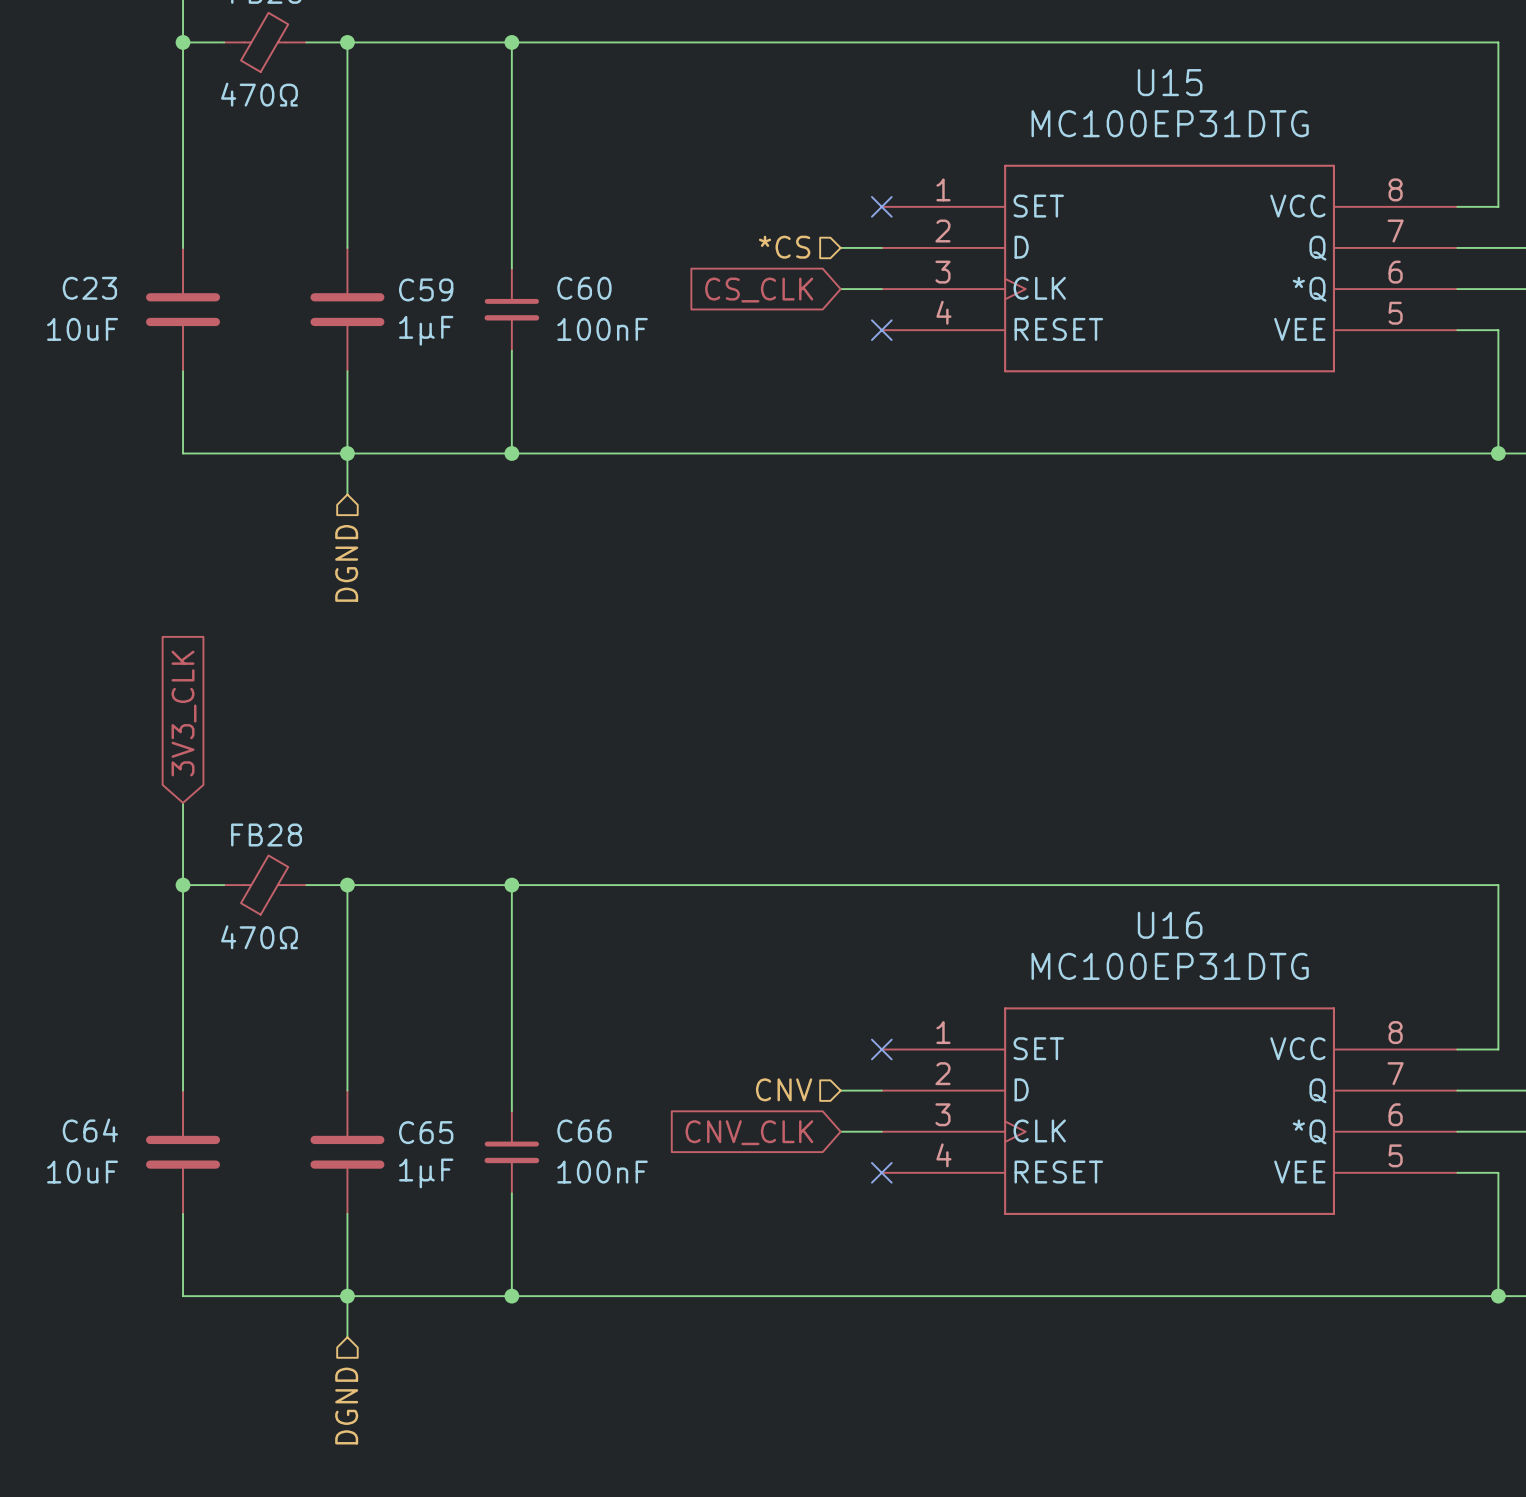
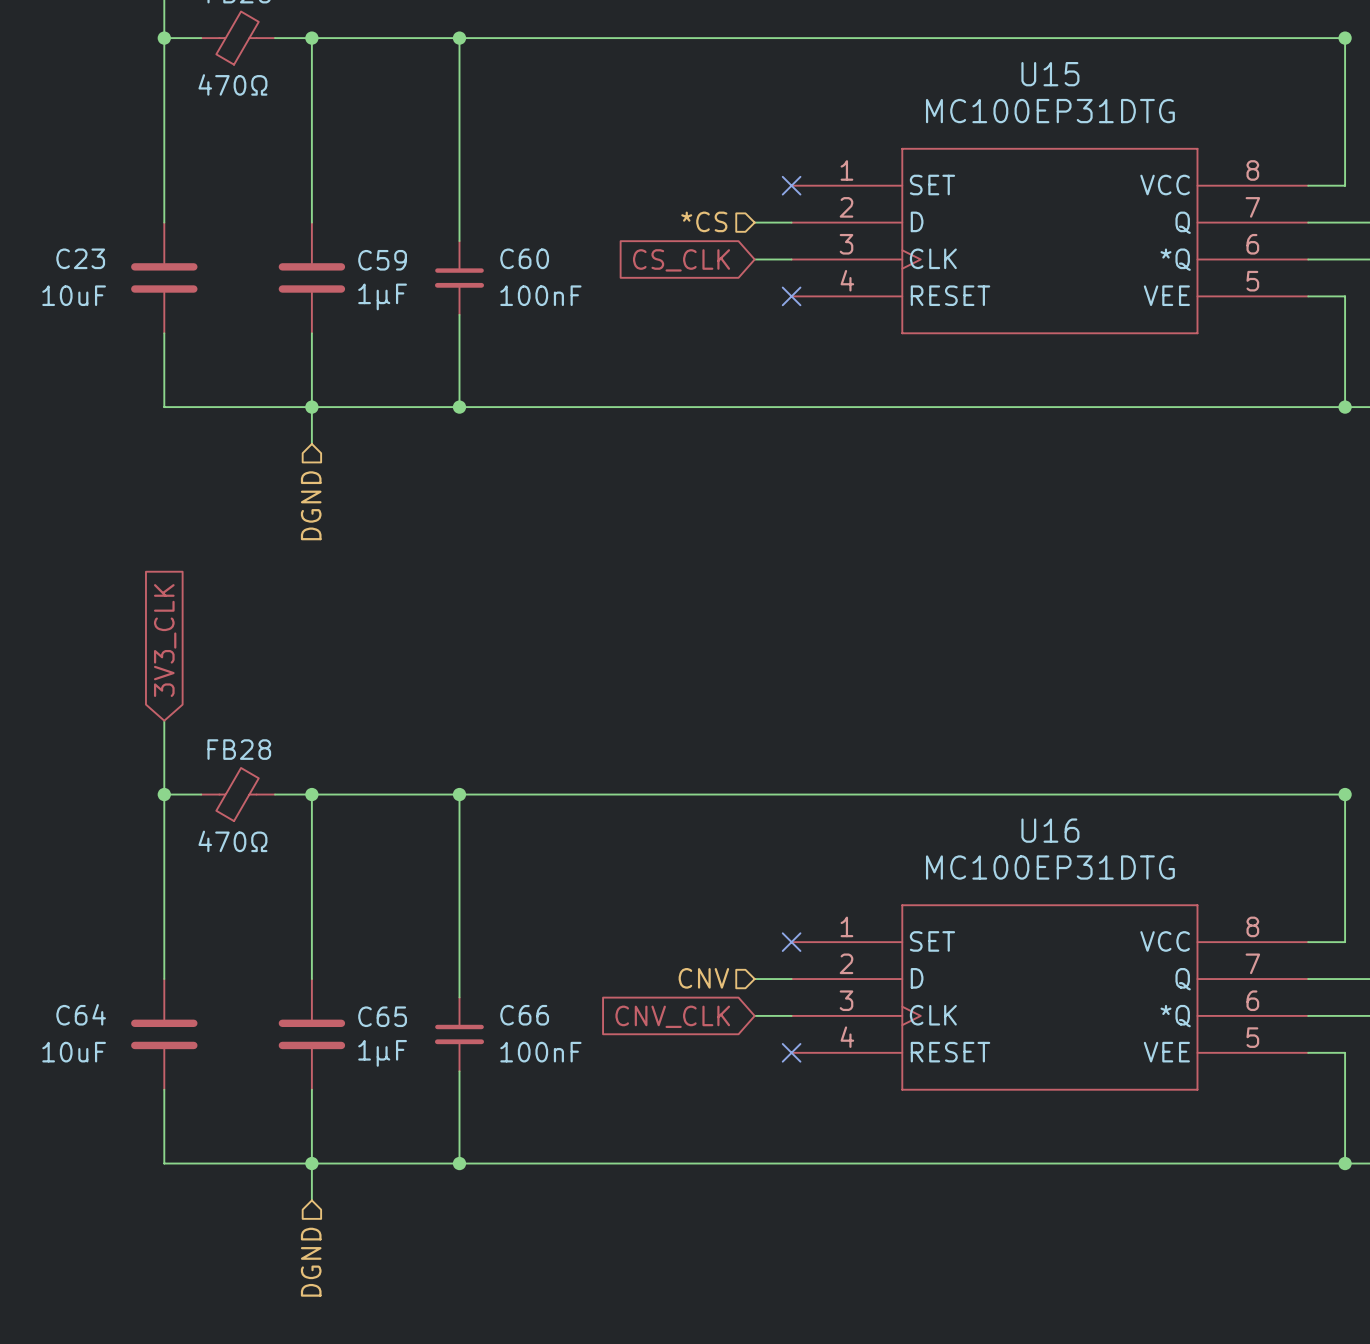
junction: none -> (1345, 38)
junction: none -> (1345, 794)

